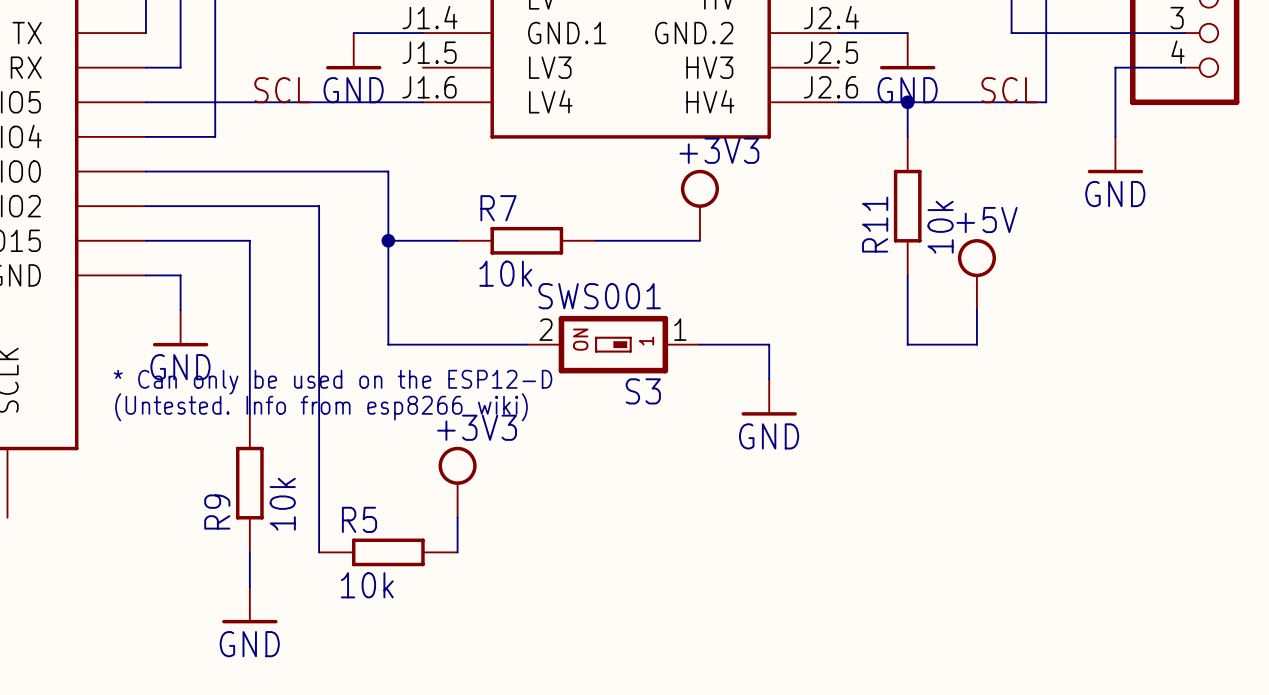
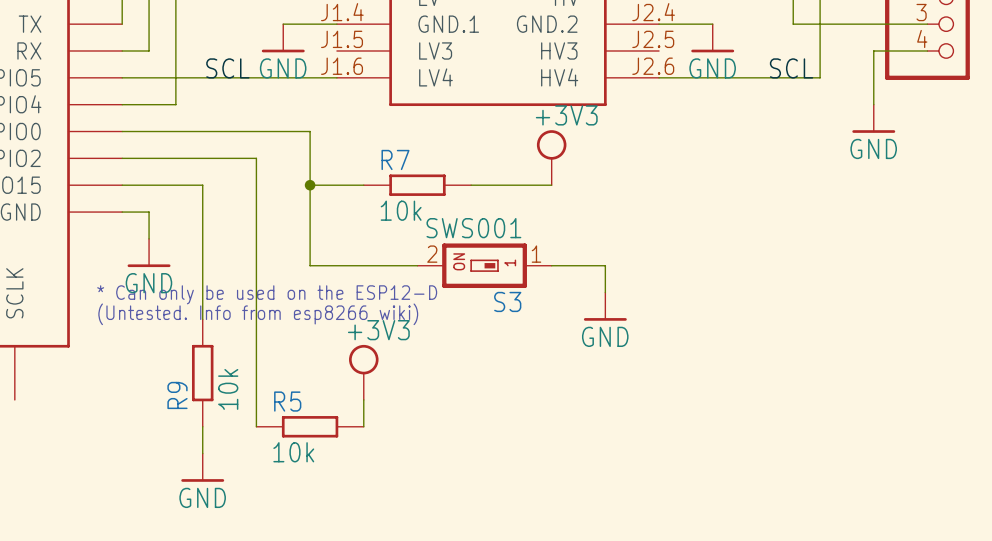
wire: (907, 102) (907, 136) -> none
junction: (907, 102) -> none
R11: 10k (907, 206) -> none
power symbol: +5V (976, 274) -> none
wire: (907, 275) (907, 344) (976, 344) (976, 310) -> none

